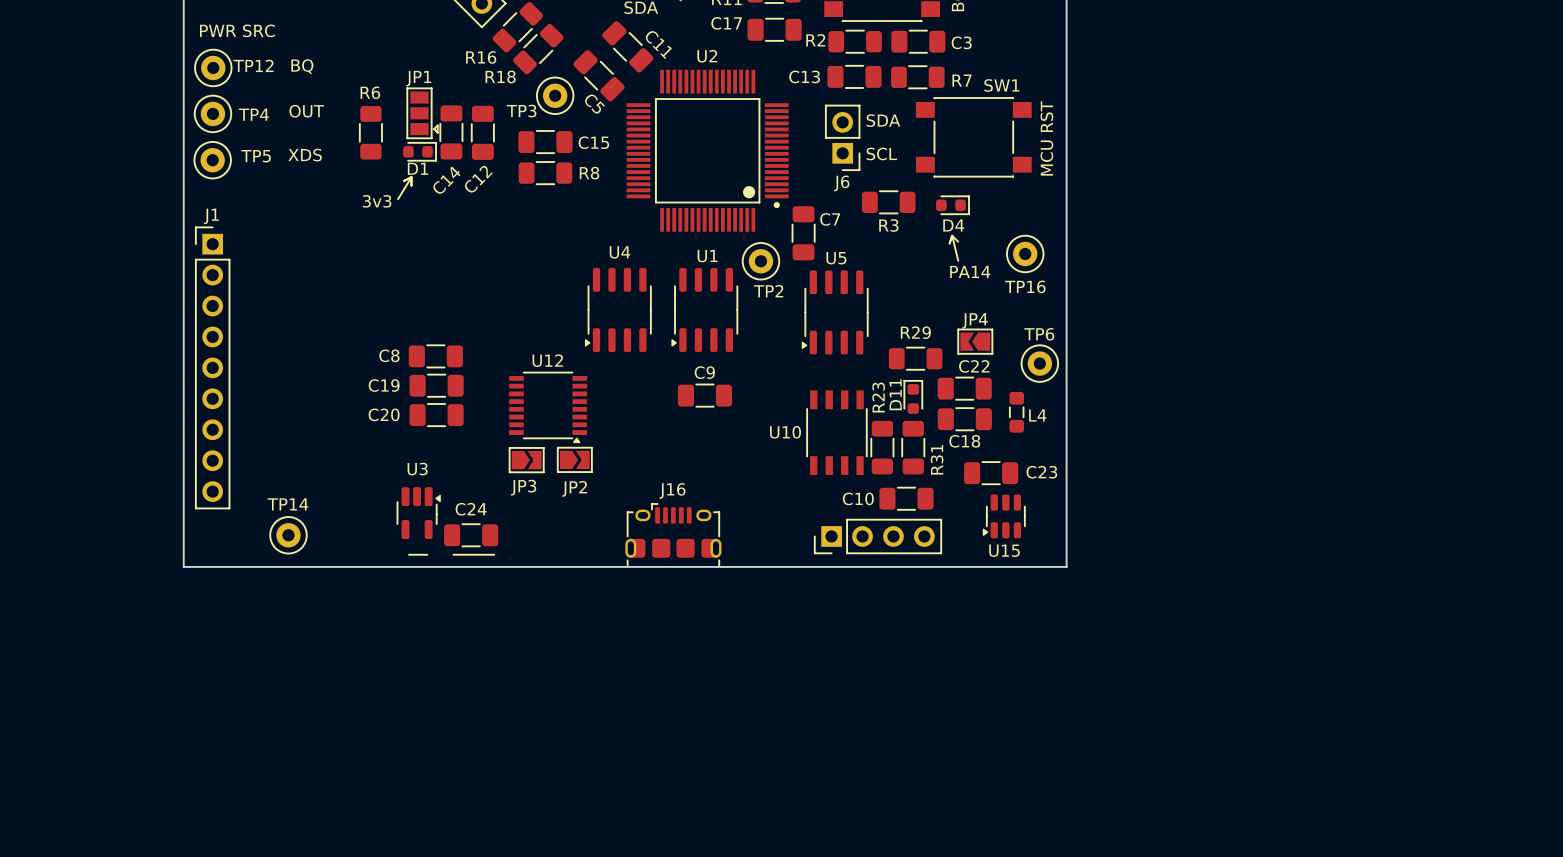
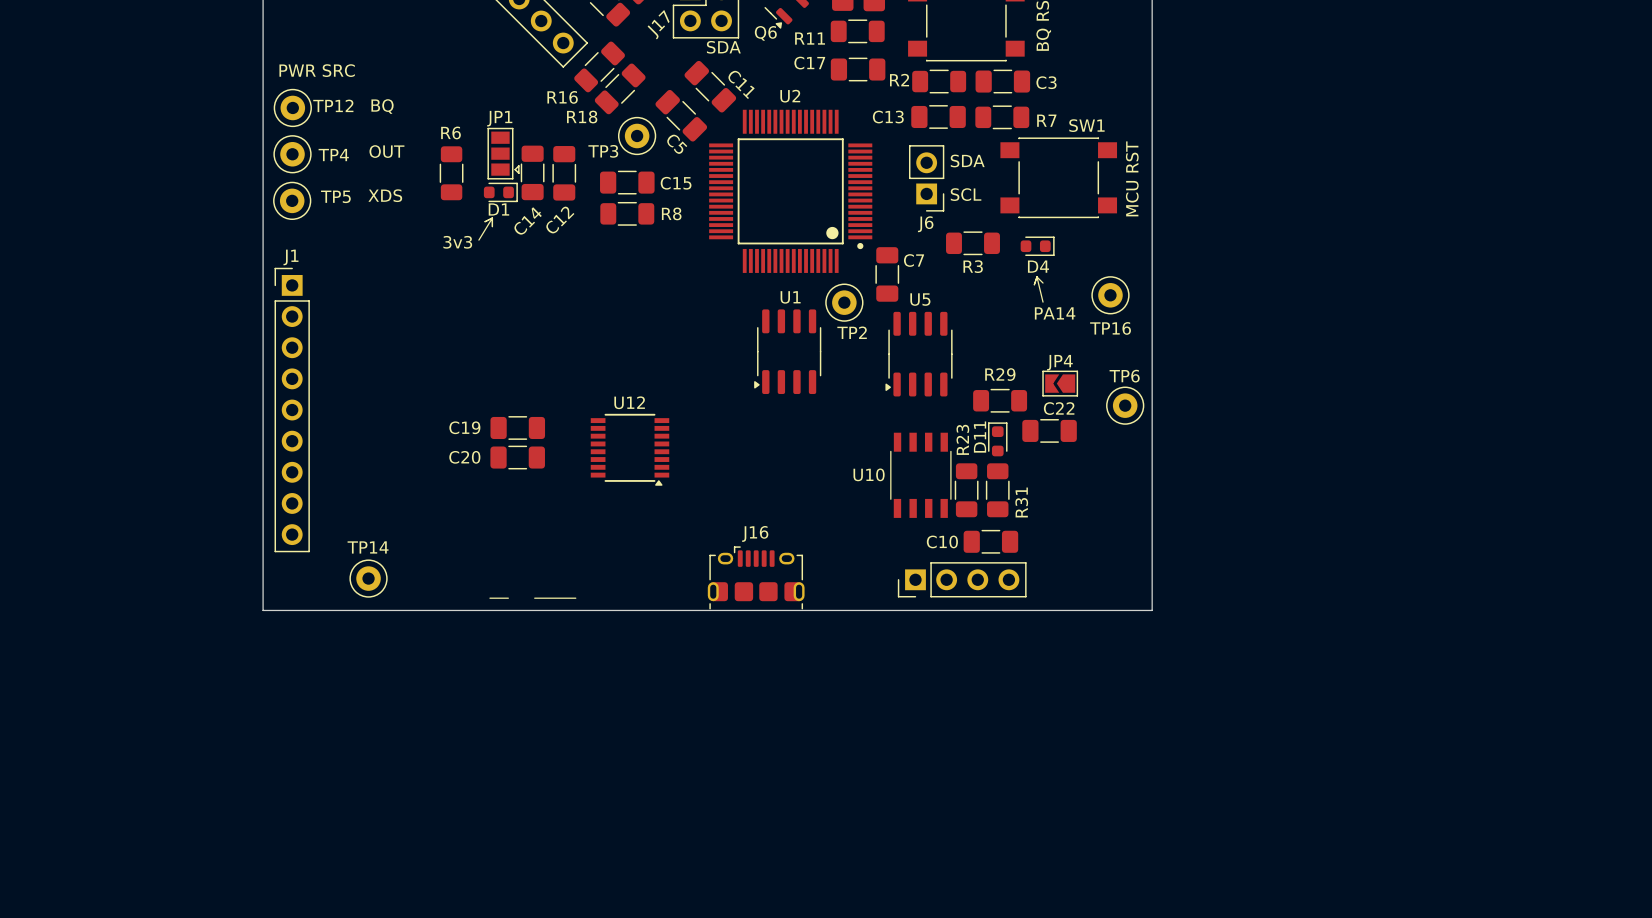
U4: (618, 309) -> none
C8: (435, 356) -> none
C9: (704, 395) -> none
L4: (1016, 412) -> none
C18: (964, 419) -> none
JP2: (574, 459) -> none
JP3: (526, 460) -> none
C23: (991, 473) -> none
U3: (418, 513) -> none
U15: (1004, 516) -> none
C24: (471, 535) -> none

